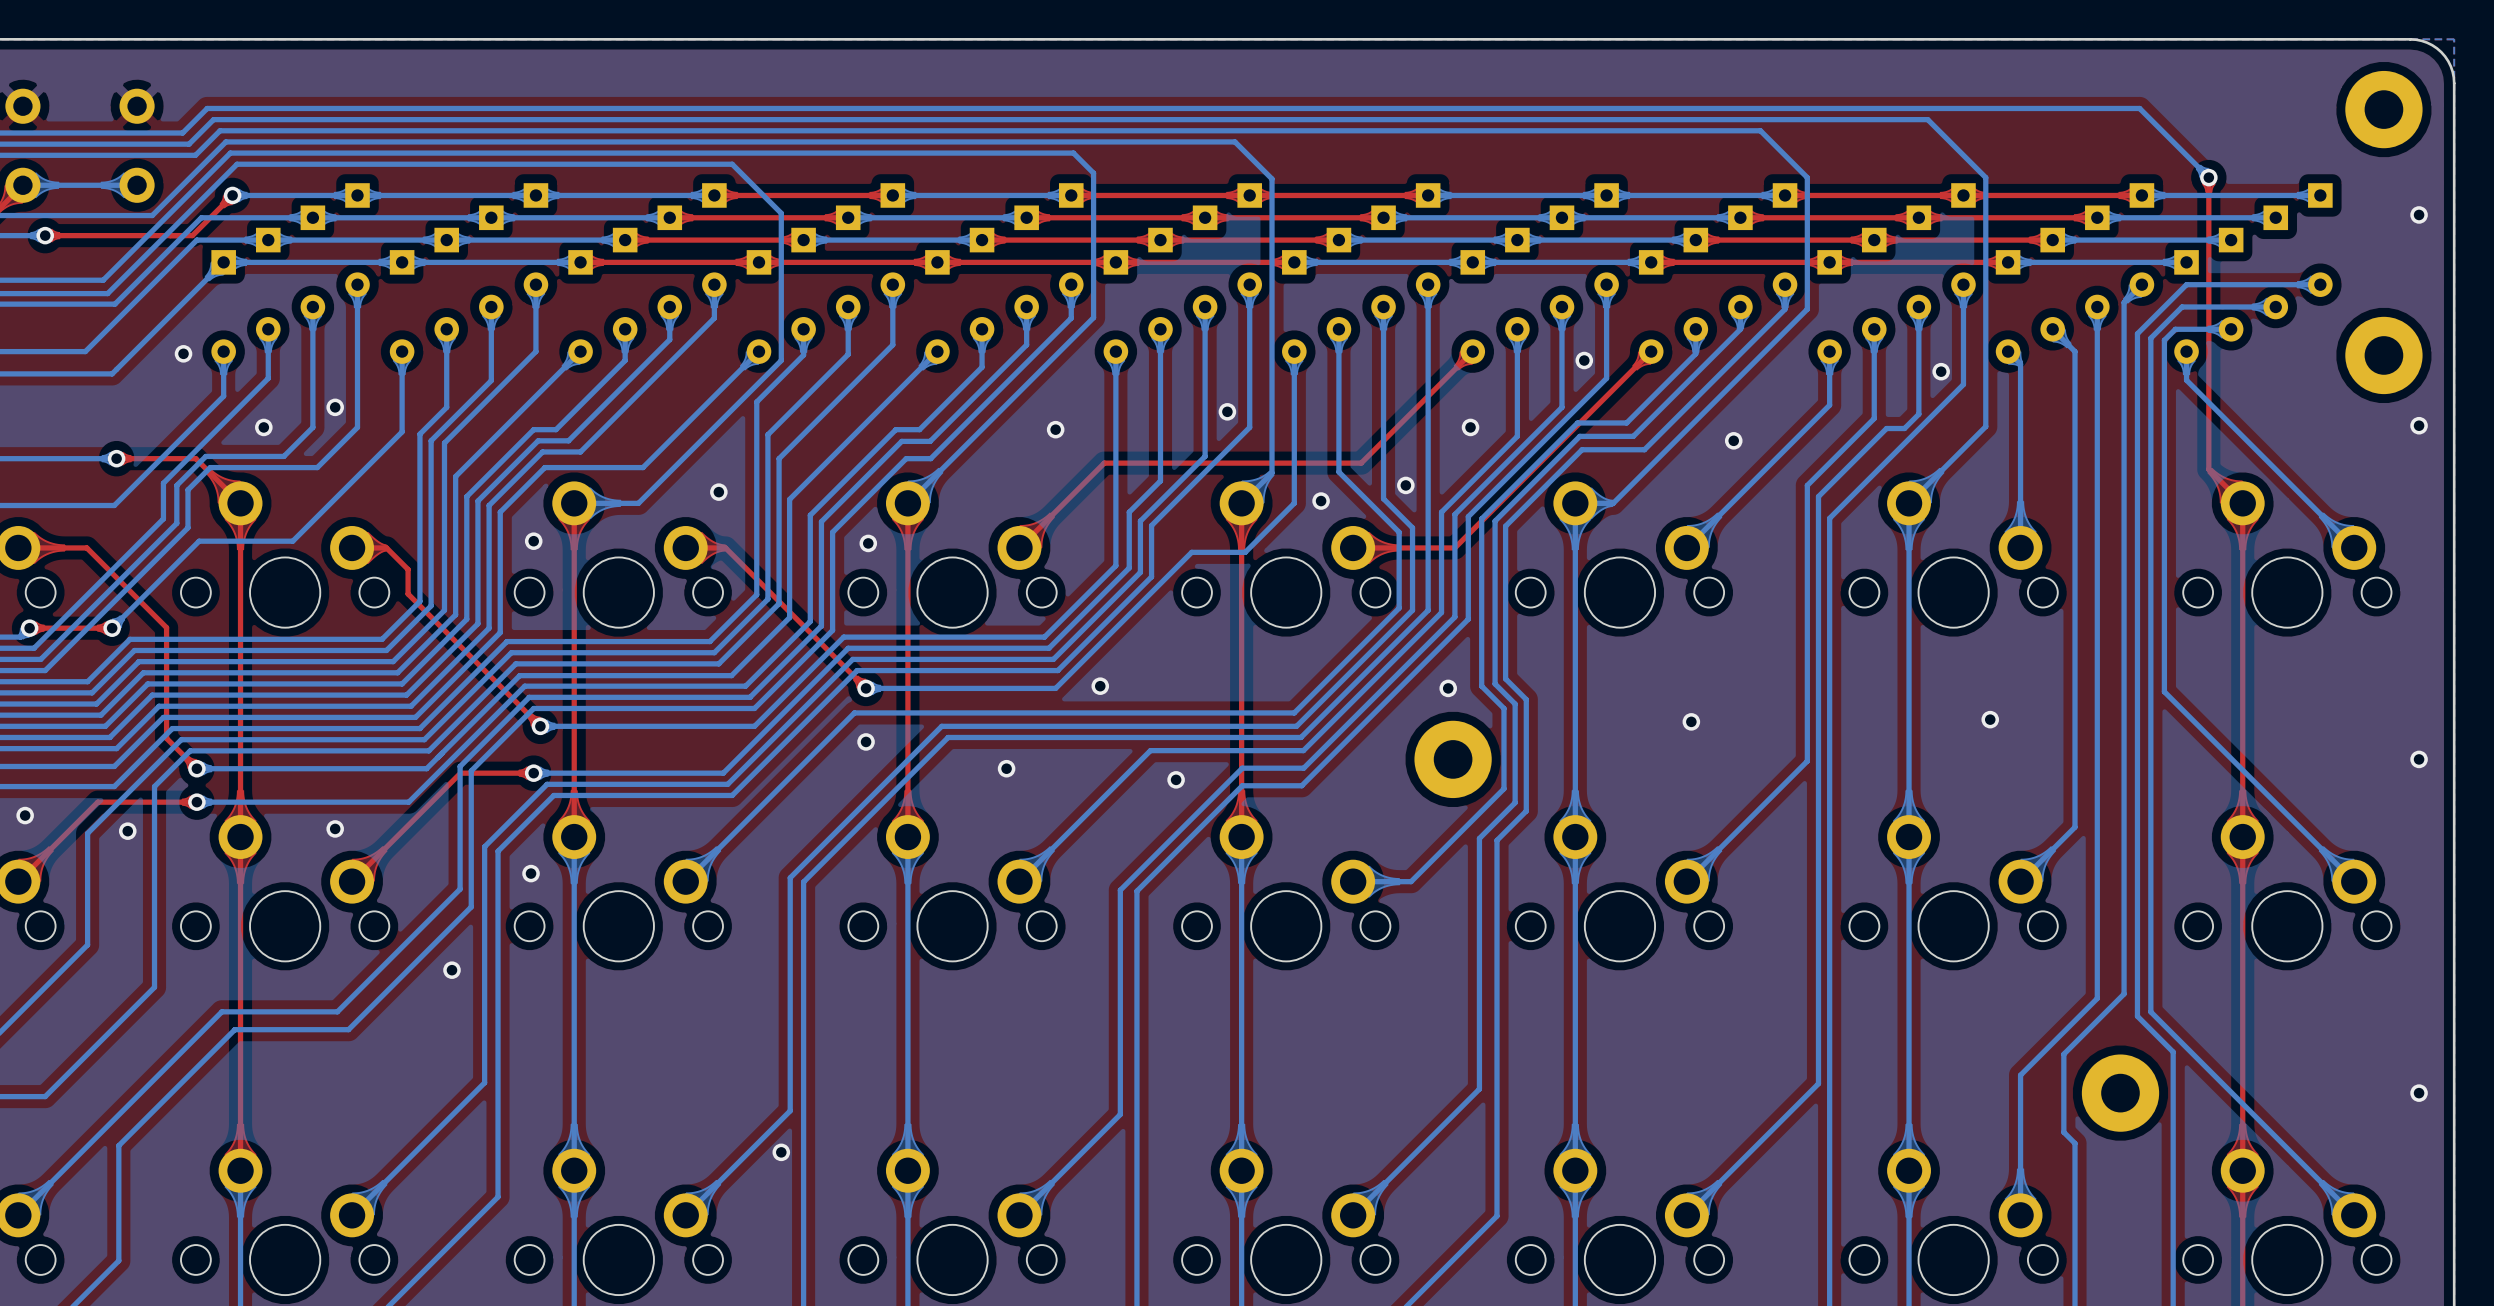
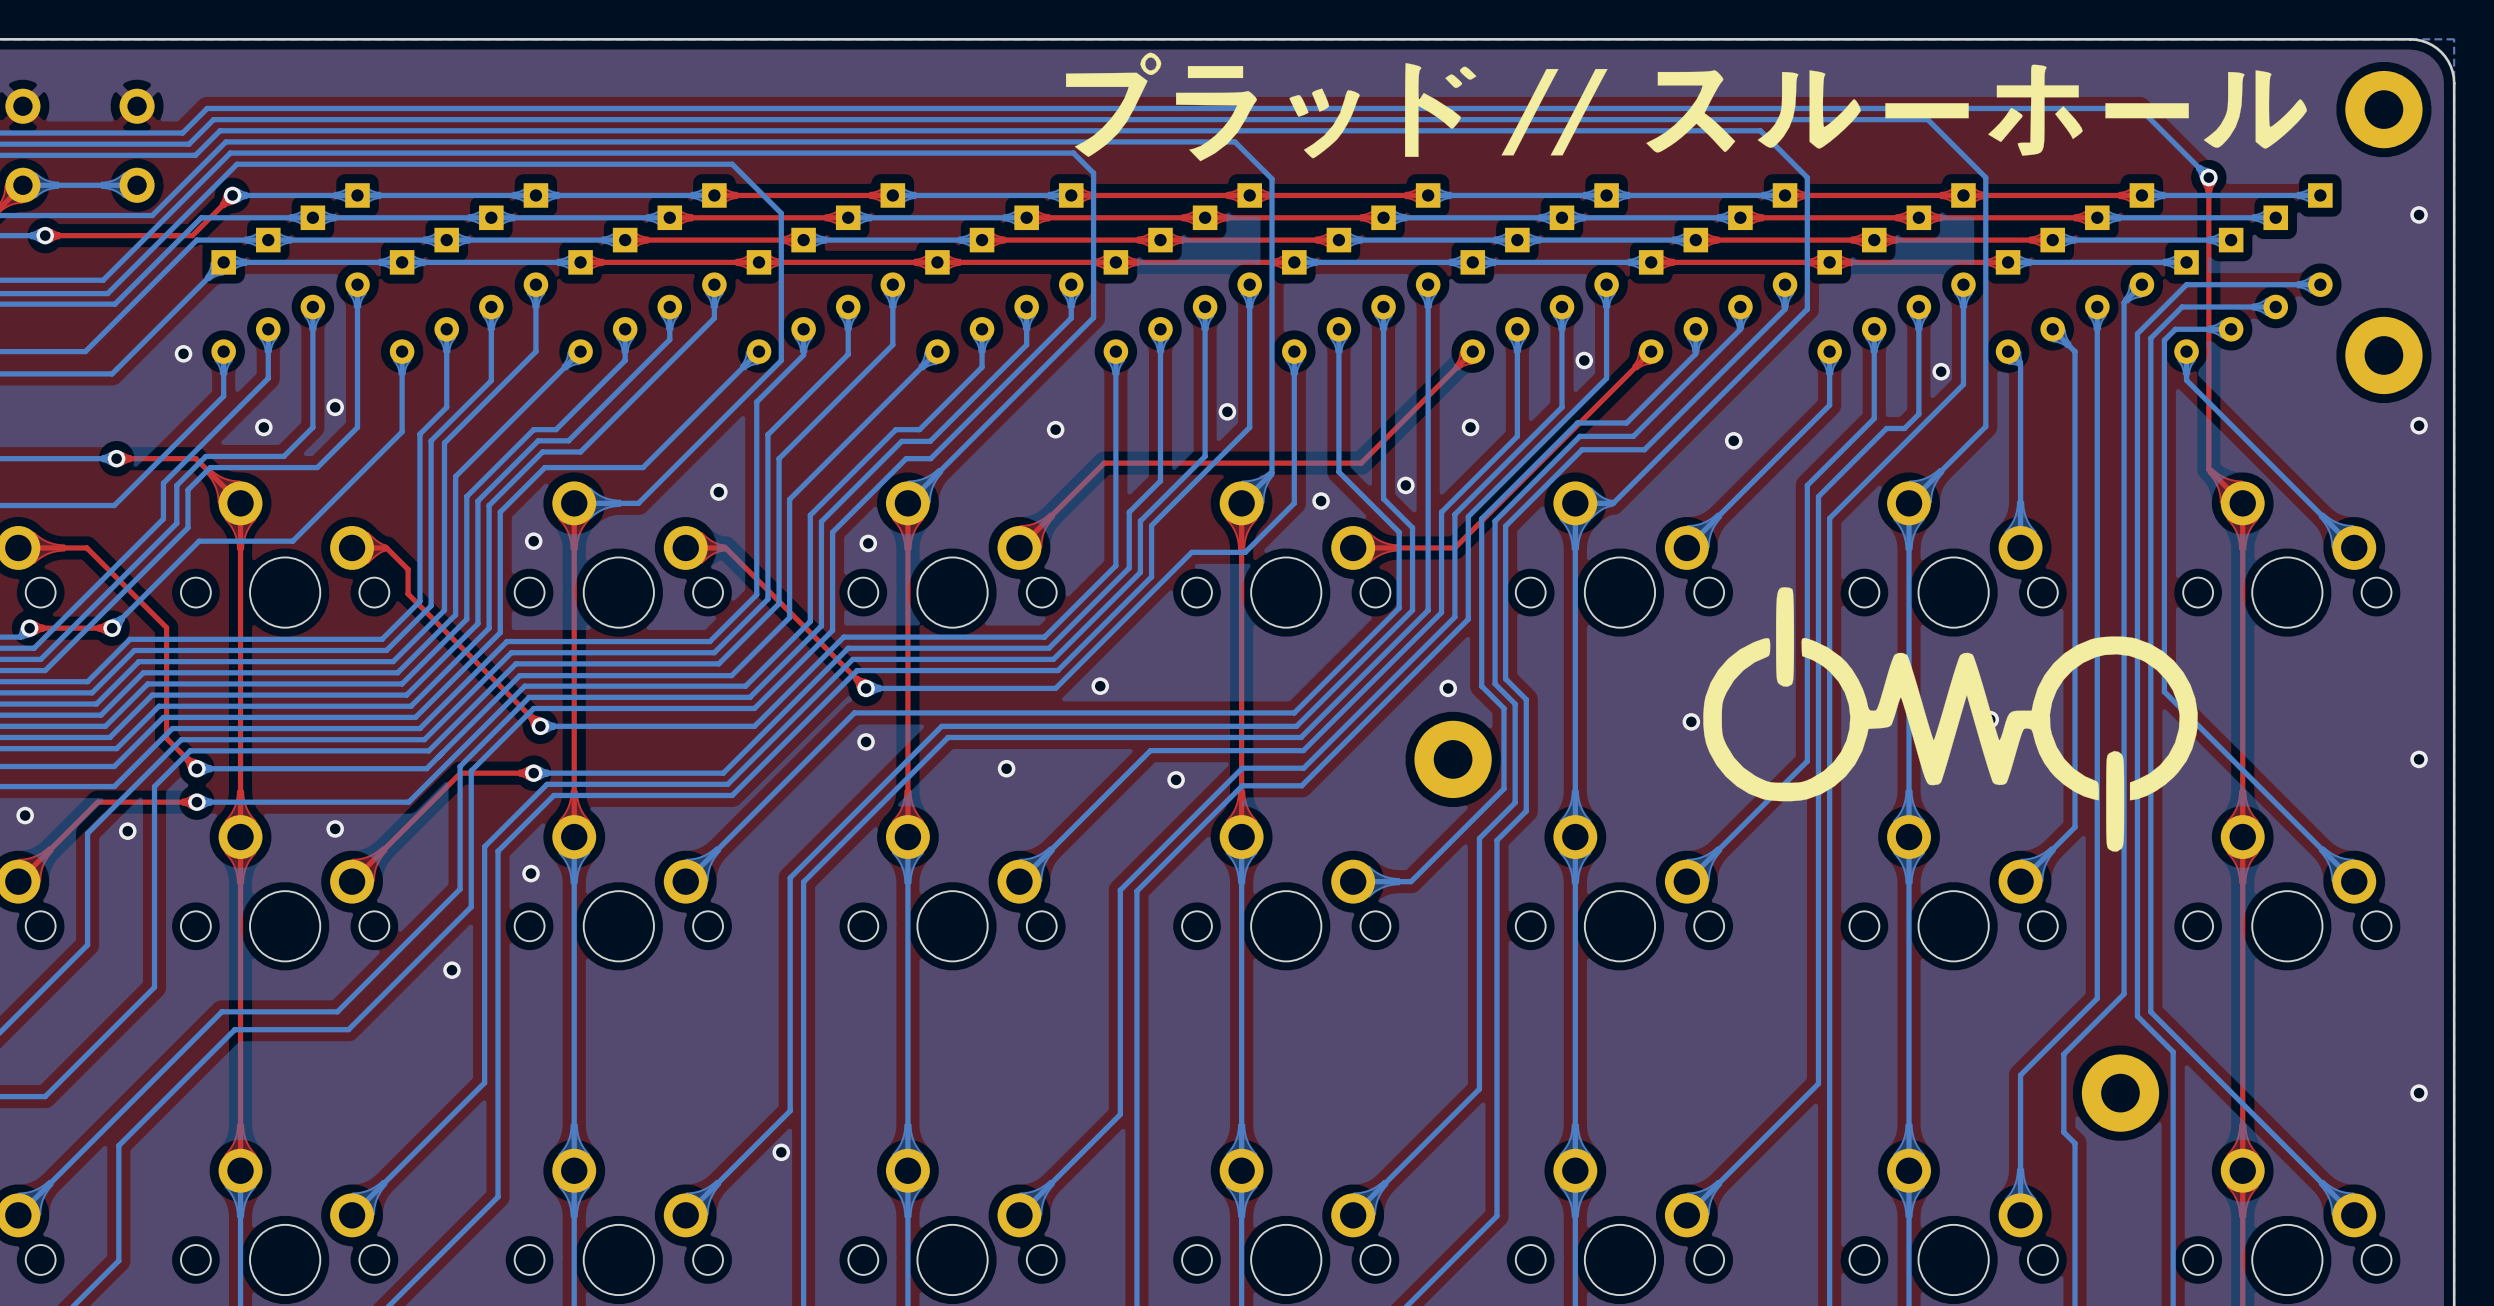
drawing: none -> [1065, 52, 2307, 162]
drawing: none -> [1703, 587, 2198, 852]

